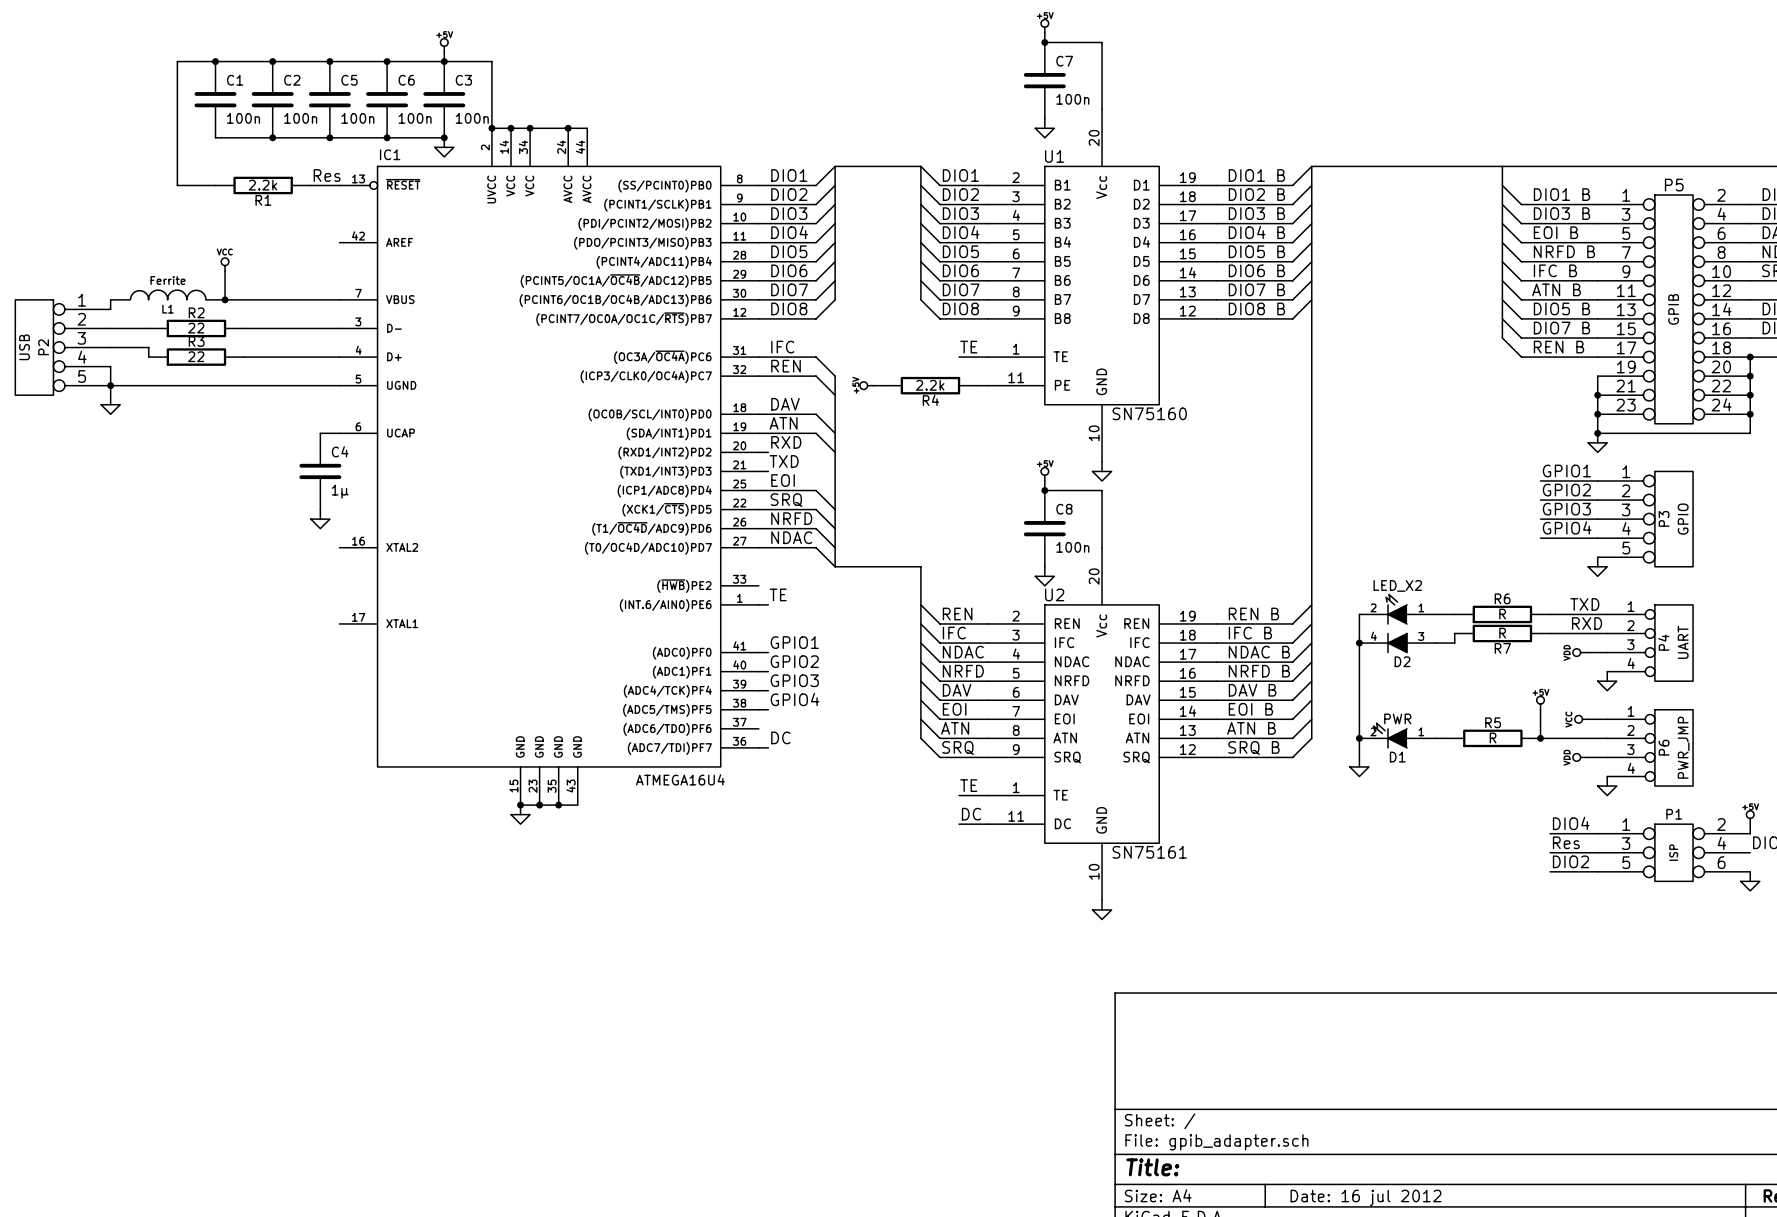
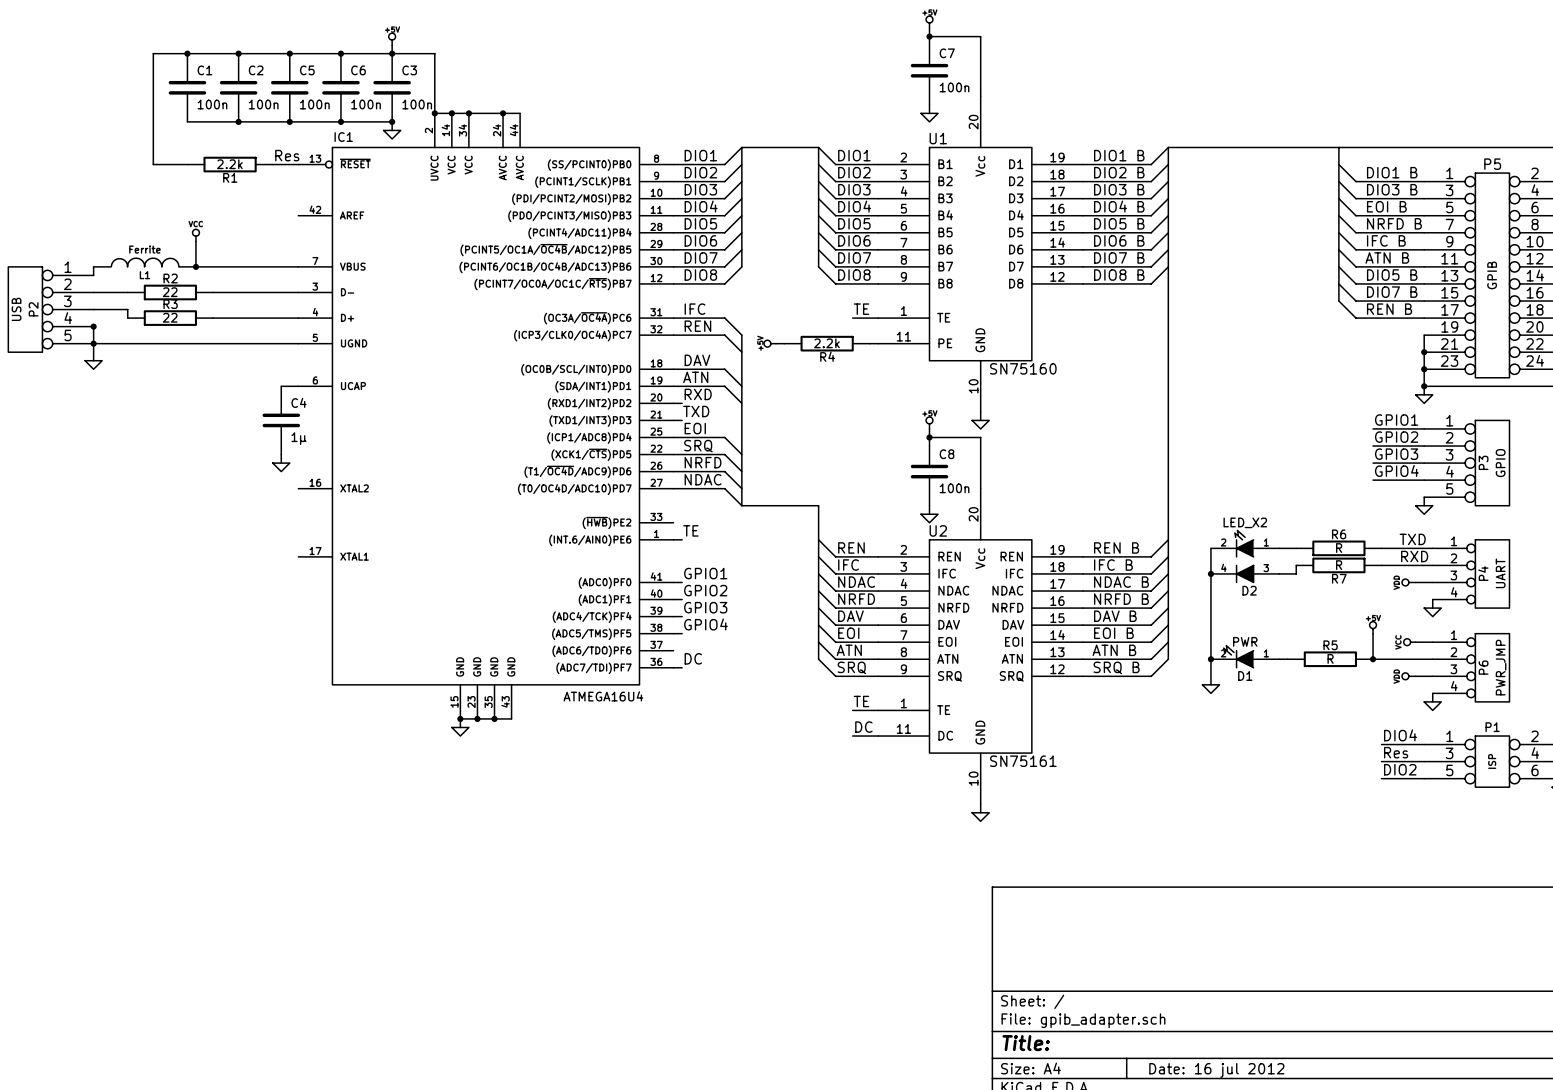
junction: none -> (93, 326)

